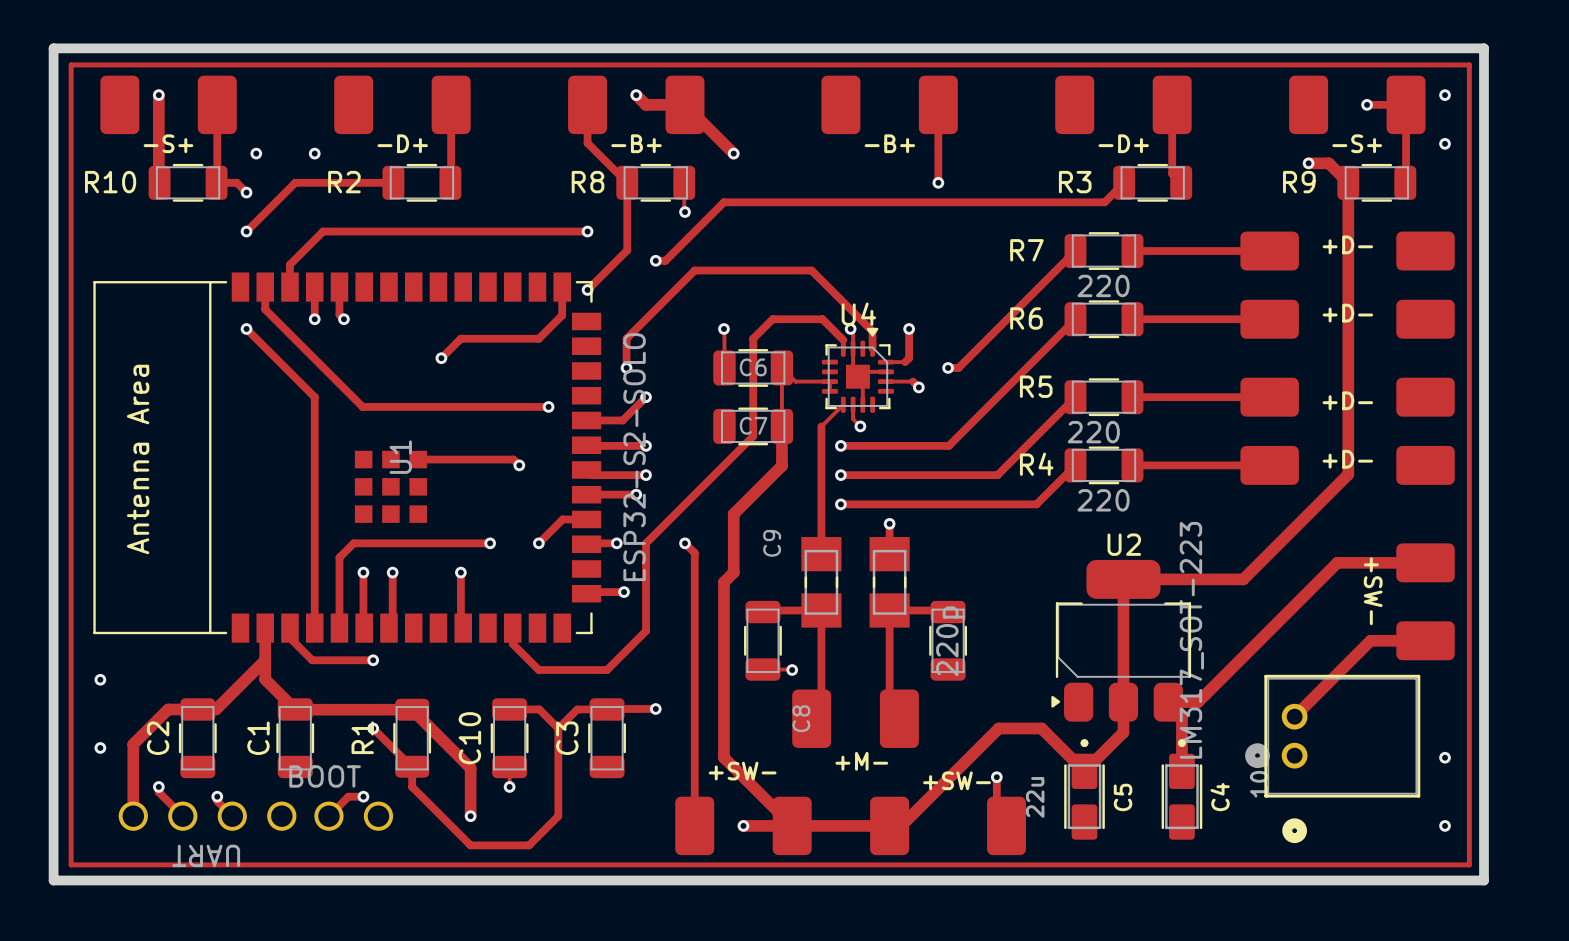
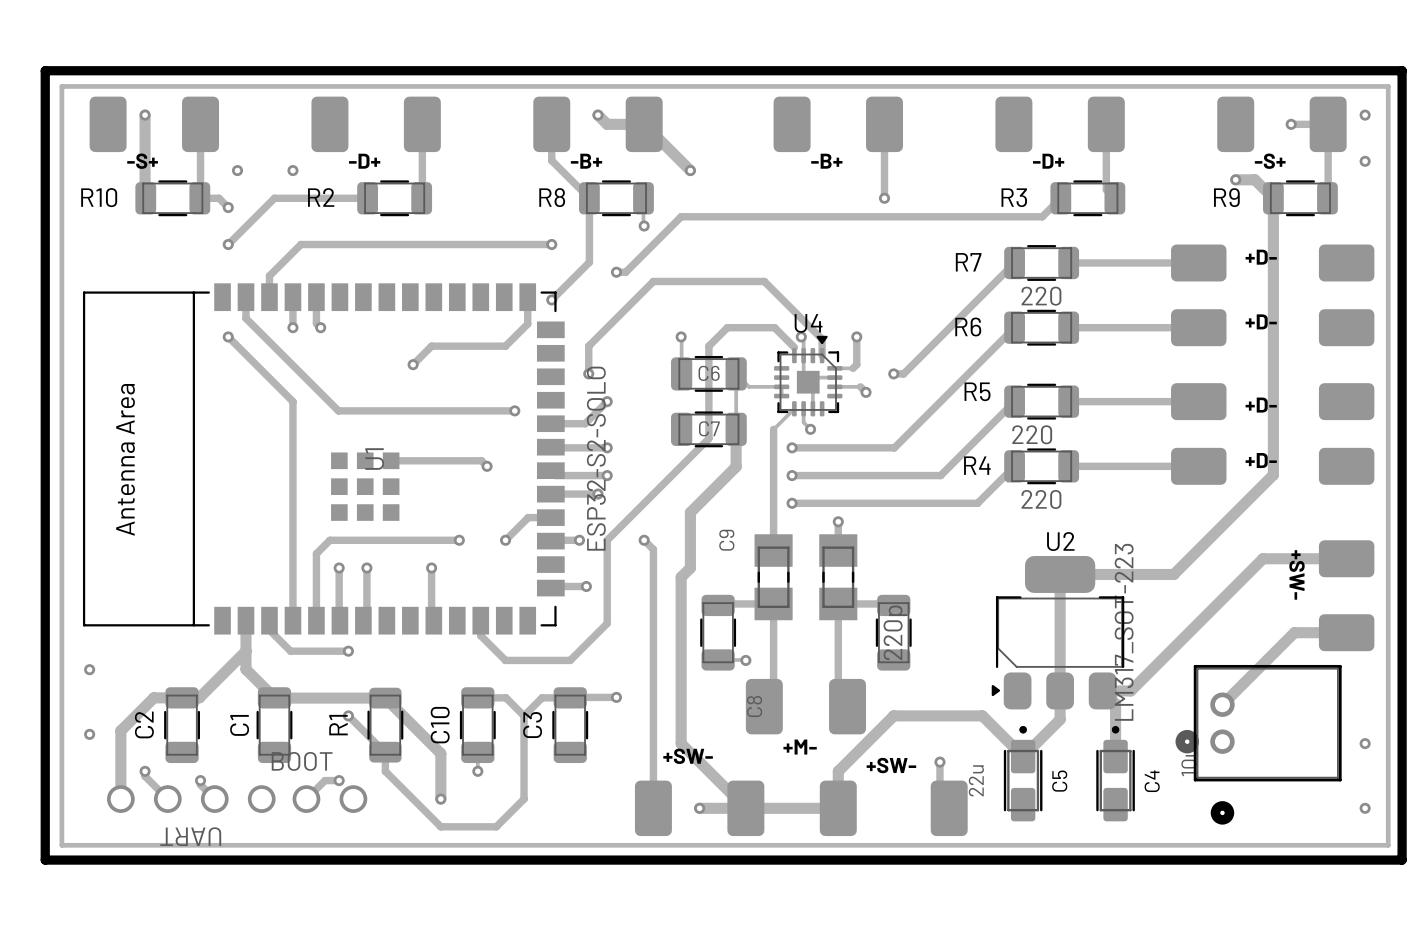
track: (998, 728) (901, 825) (889, 825) -> (941, 715) (893, 715) (838, 771) (838, 808)

